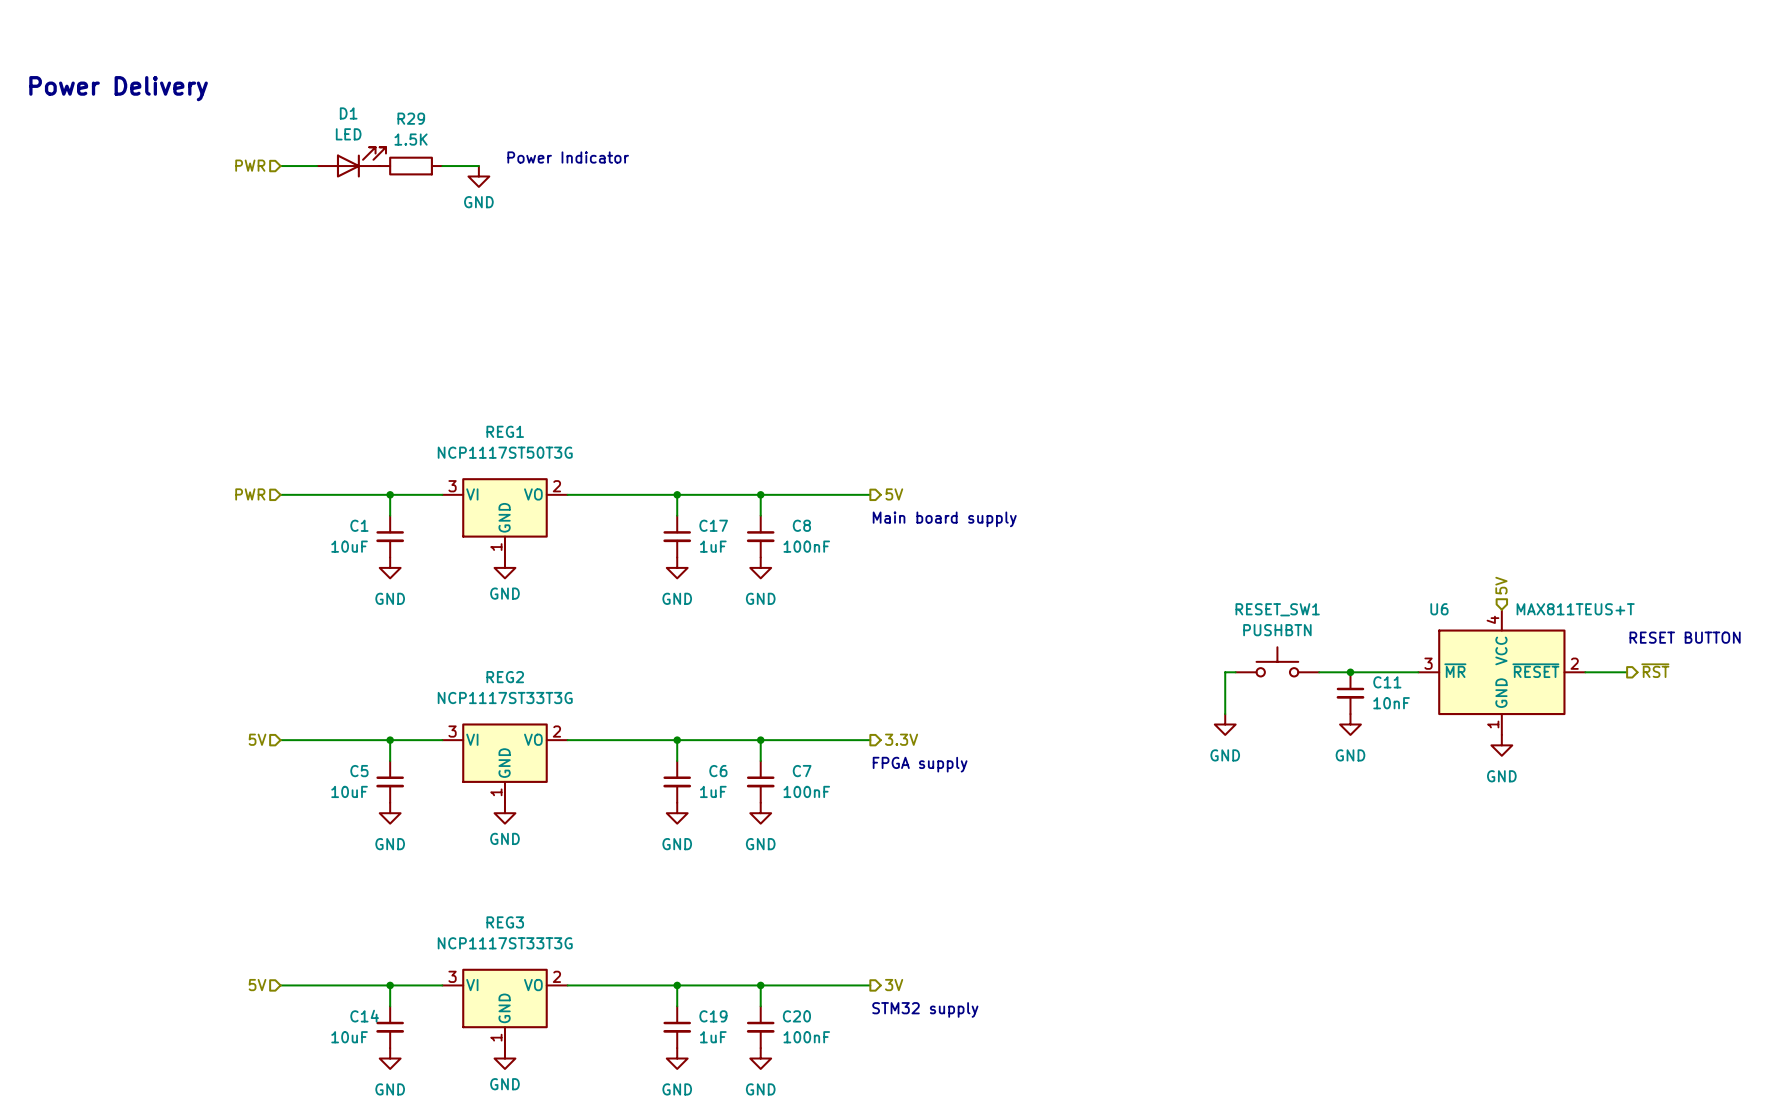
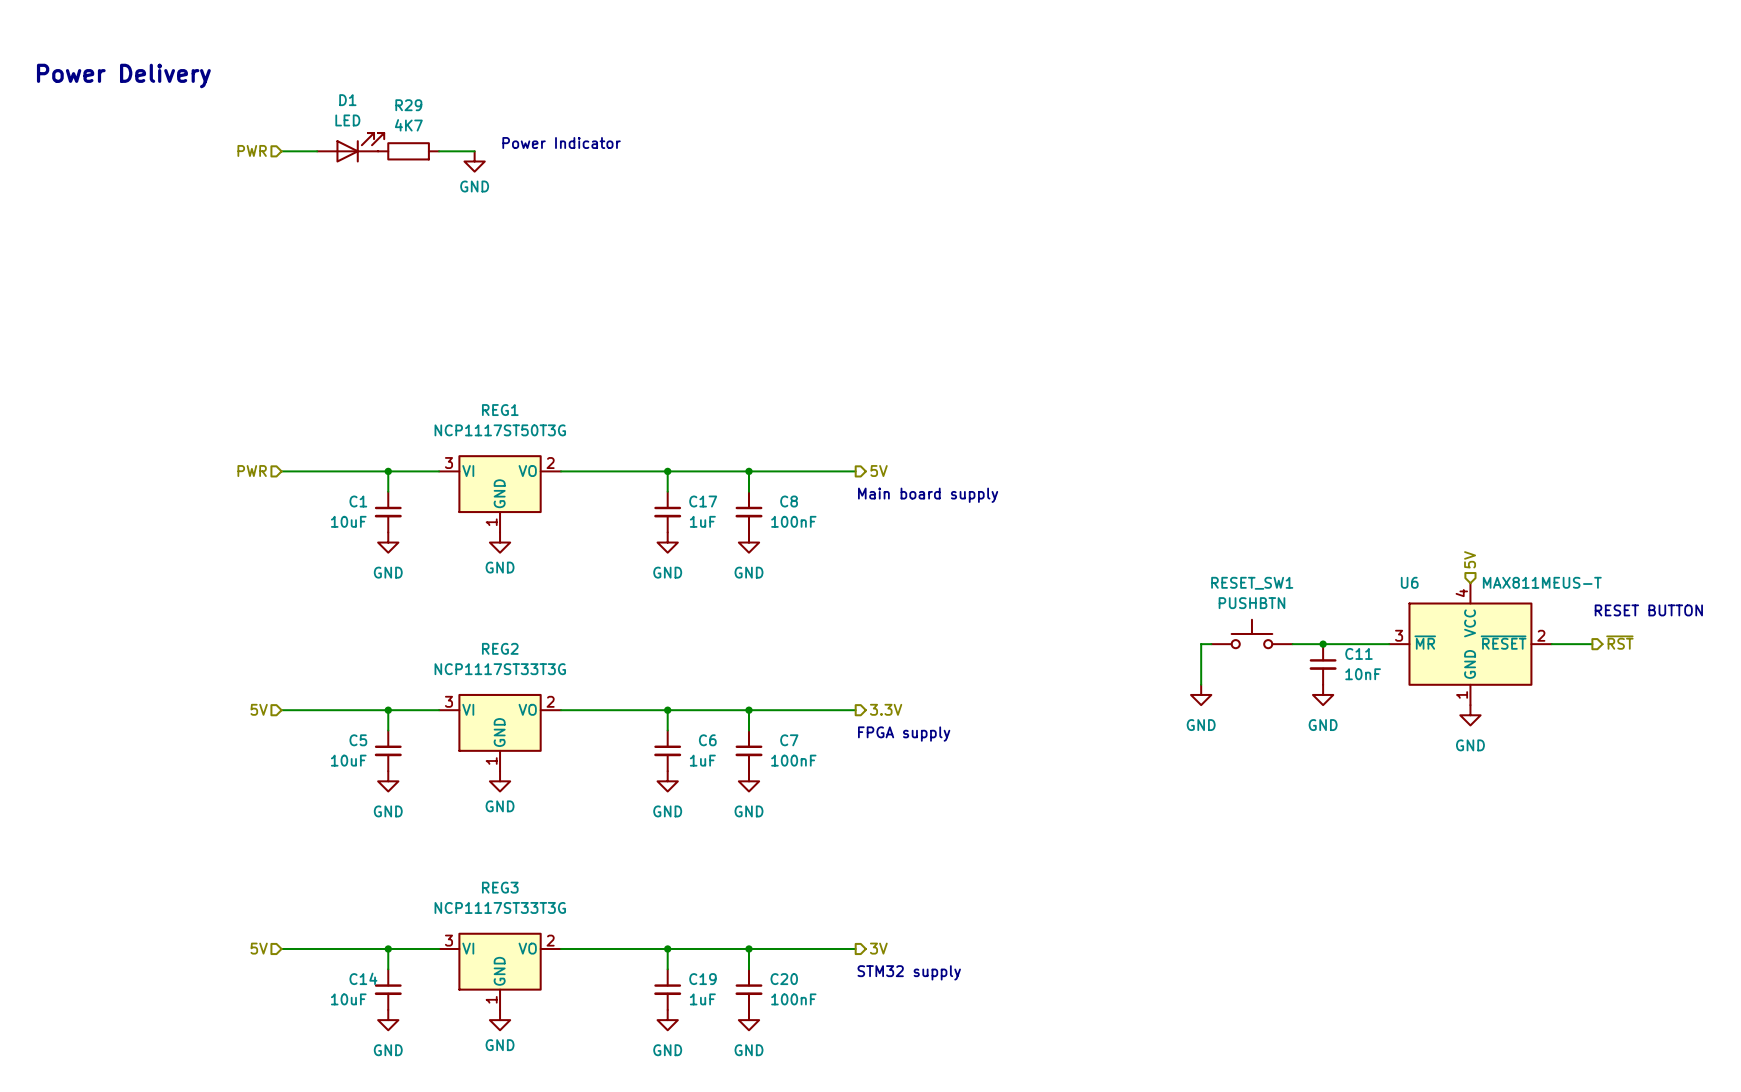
R29 value: 1.5K (411, 139) -> 4K7 (408, 125)
U6 value: MAX811TEUS+T (1575, 609) -> MAX811MEUS-T (1542, 582)

